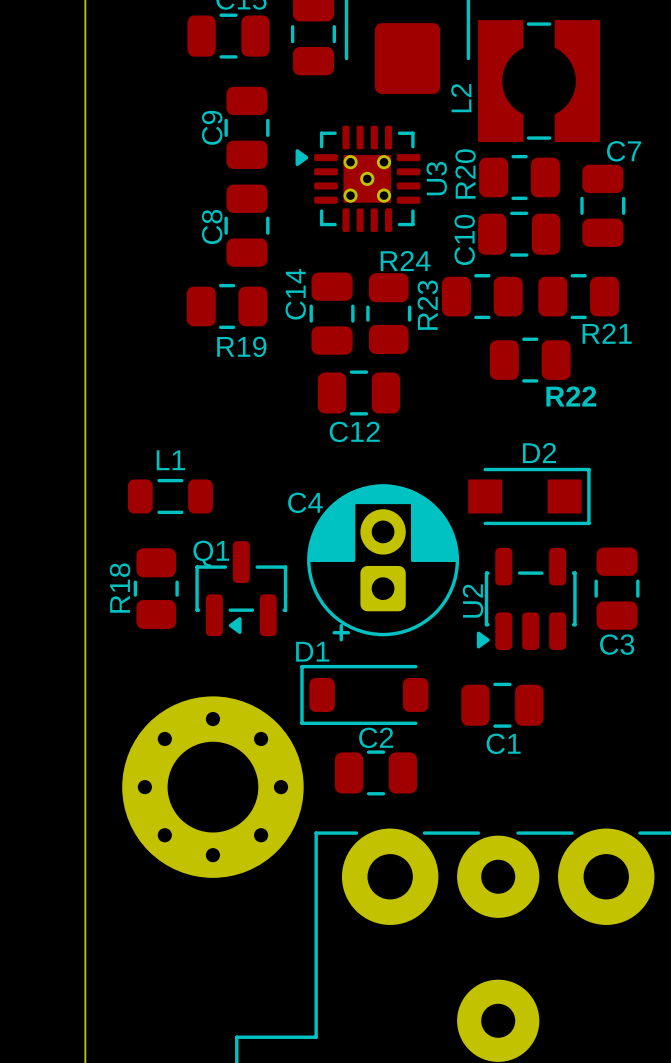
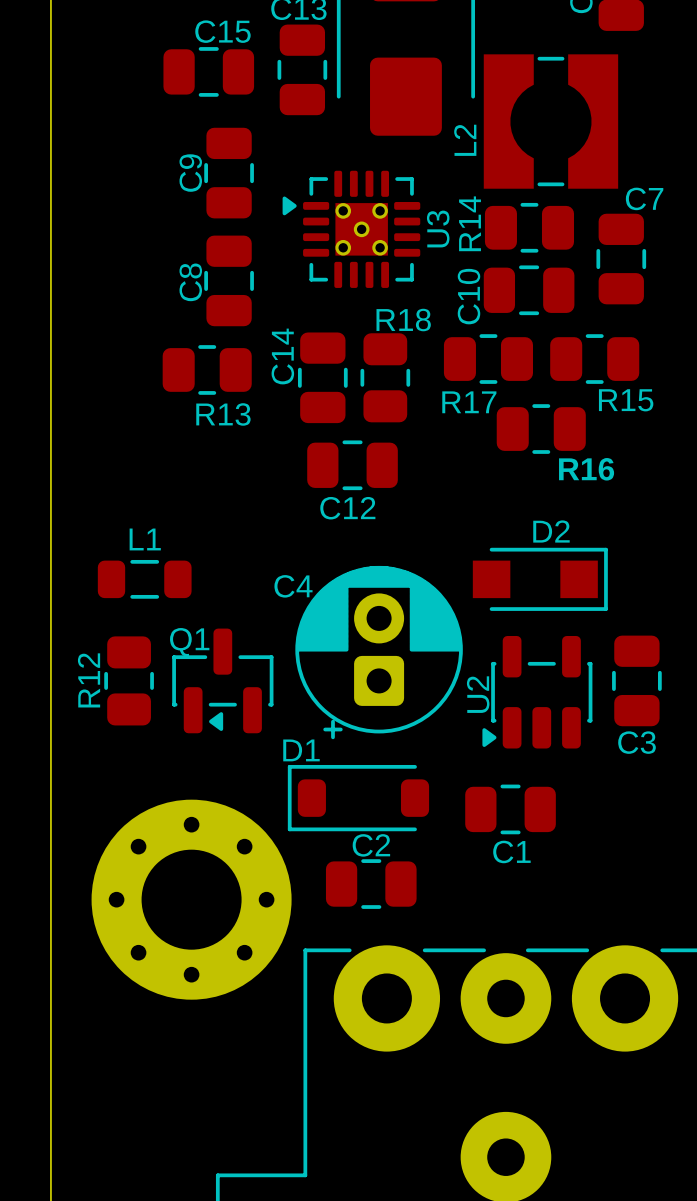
R20 name: R20 (465, 174) -> R14 (470, 223)
R24 name: R24 (405, 261) -> R18 (403, 320)
R23 name: R23 (427, 305) -> R17 (469, 402)
R21 name: R21 (607, 333) -> R15 (626, 400)
R19 name: R19 (241, 346) -> R13 (223, 414)
R22 name: R22 (571, 396) -> R16 (586, 469)
R18 name: R18 (120, 588) -> R12 (89, 680)

